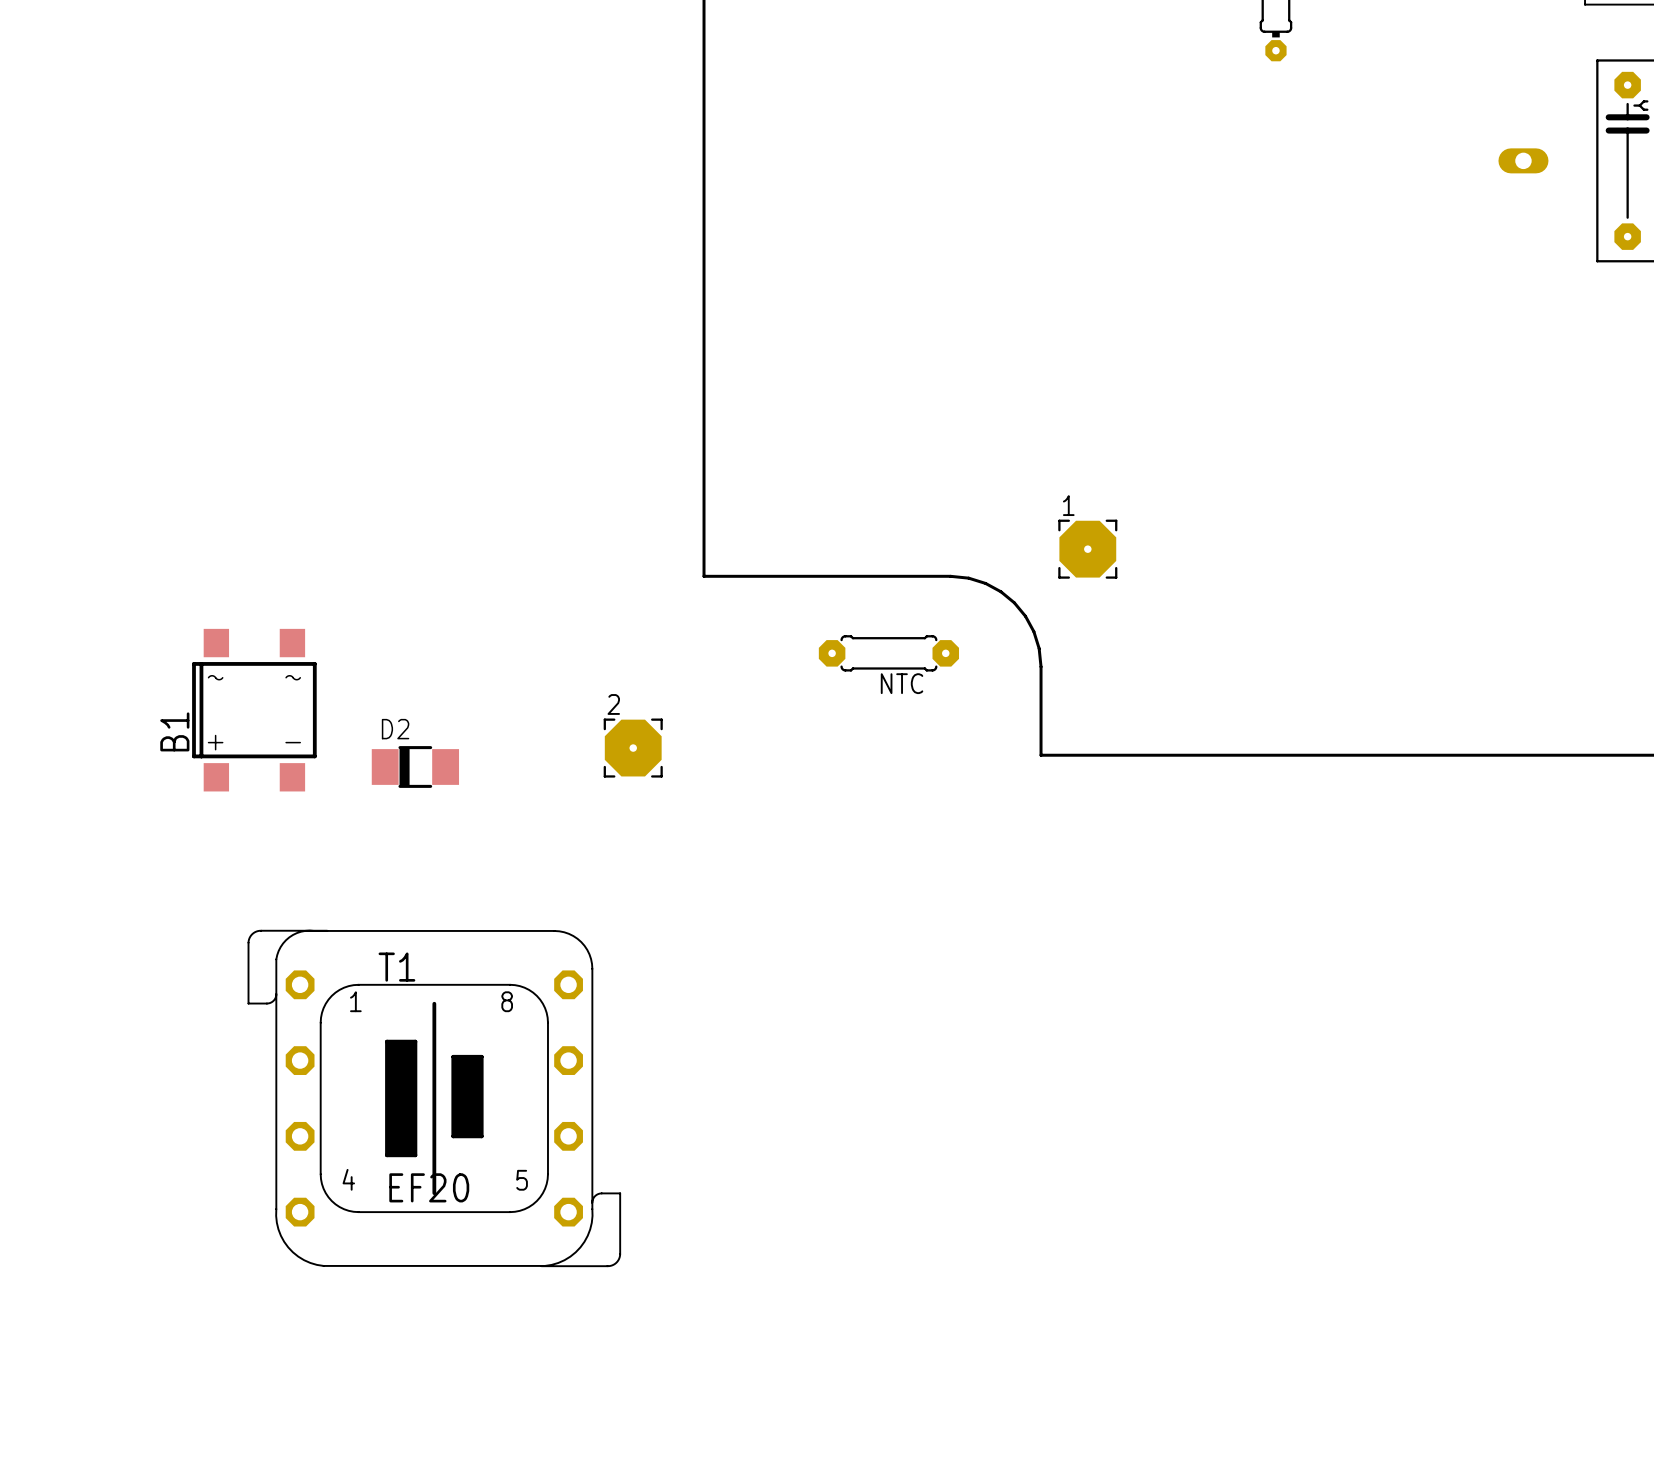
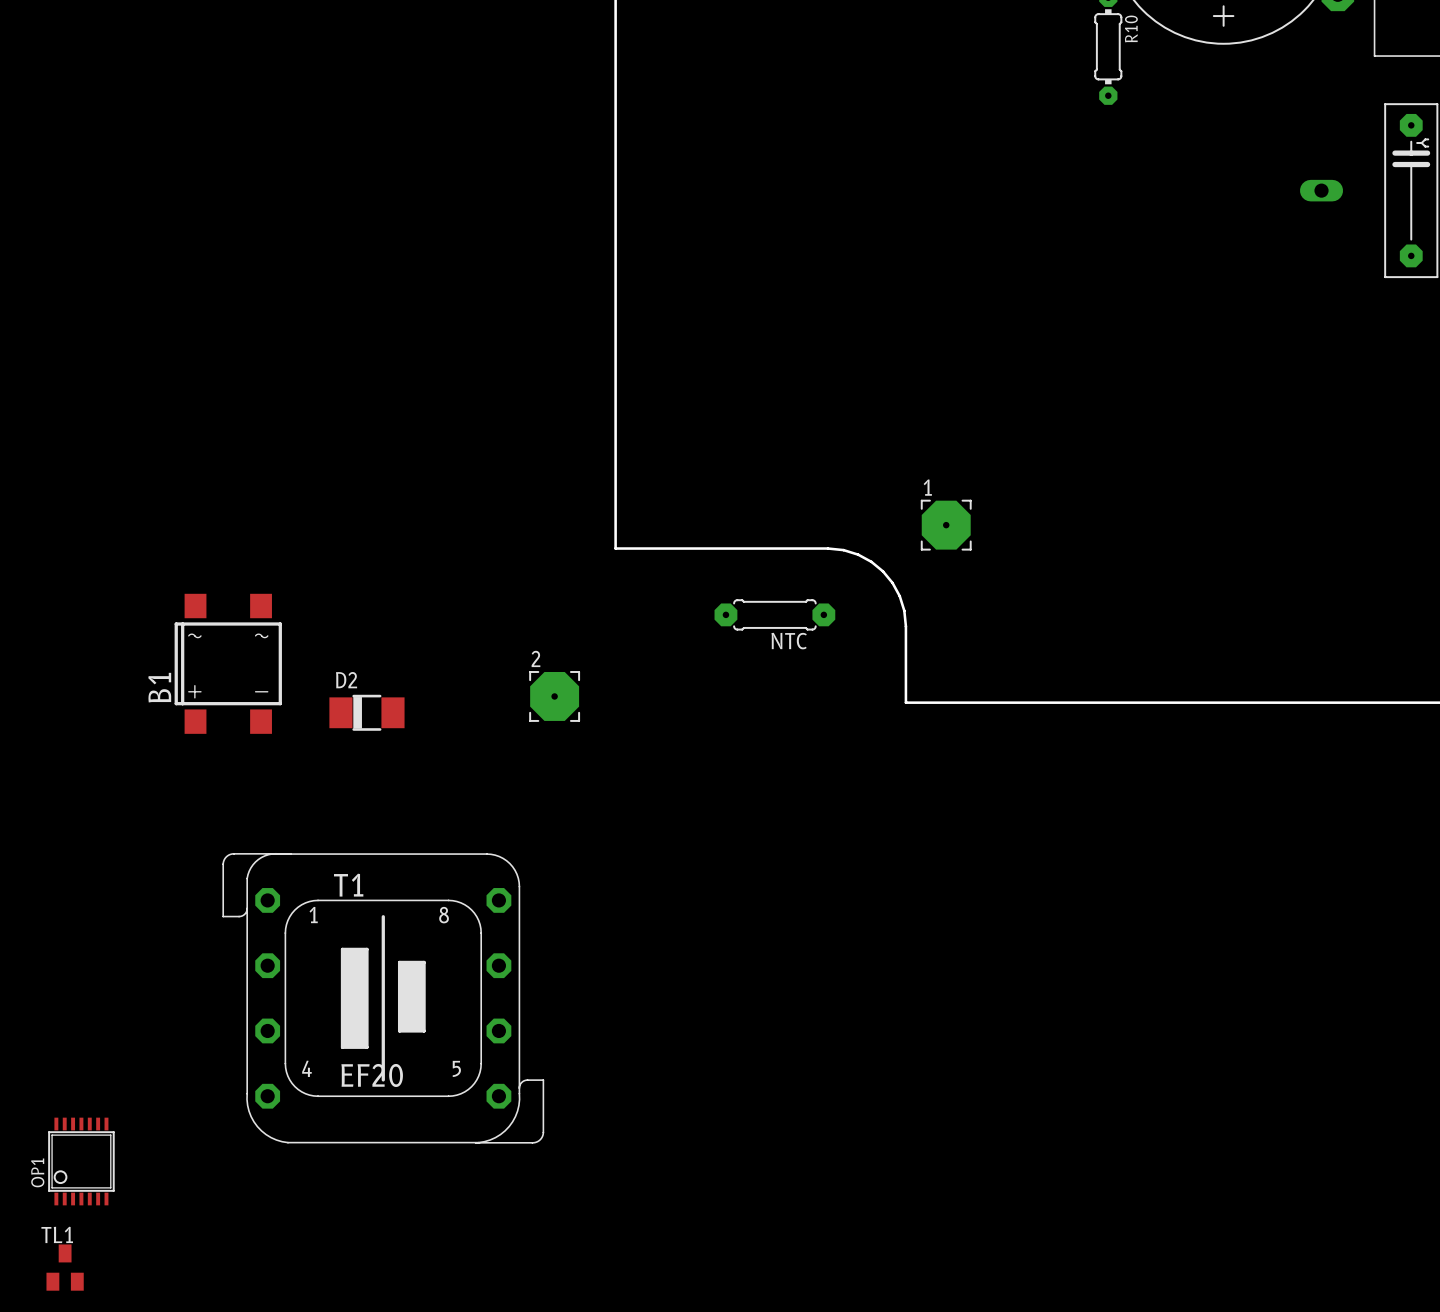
OP1: none -> (81, 1161)
TL1: none -> (65, 1267)

